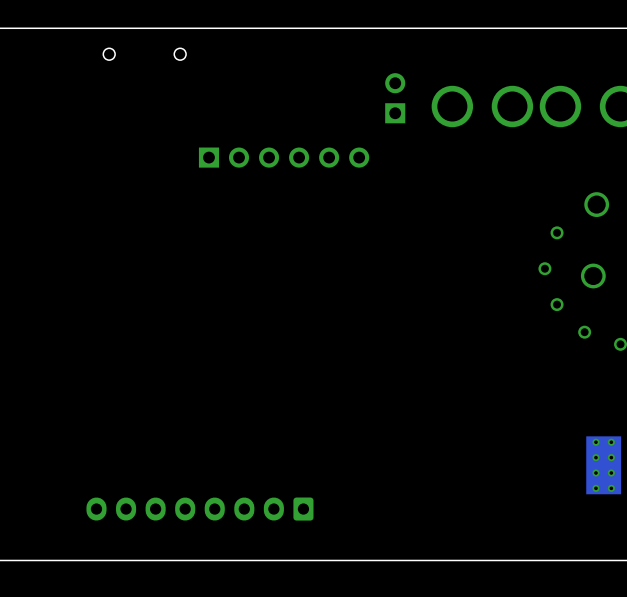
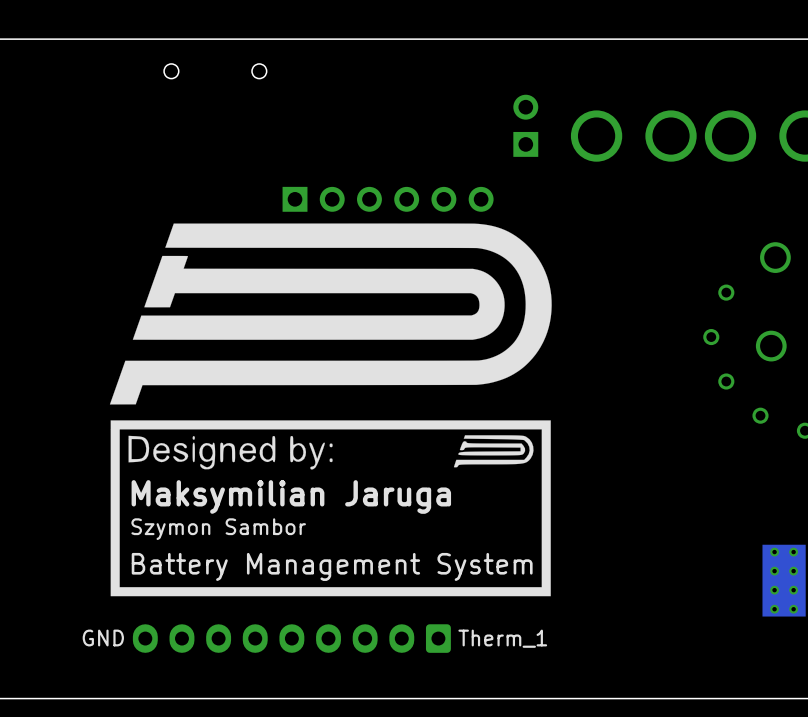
drawing: none -> [109, 223, 552, 597]
text: none -> Maksymilian Jaruga (291, 496)
text: none -> Szymon Sambor (218, 529)
text: none -> Battery Management System (332, 566)
part footprint: [86, 497, 314, 521] -> [132, 624, 451, 653]
text: none -> GND (103, 638)
text: none -> Therm_1 (502, 638)

